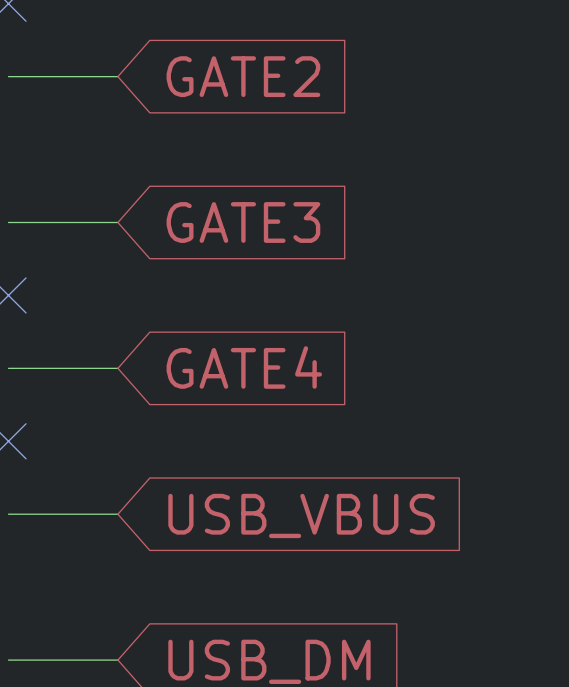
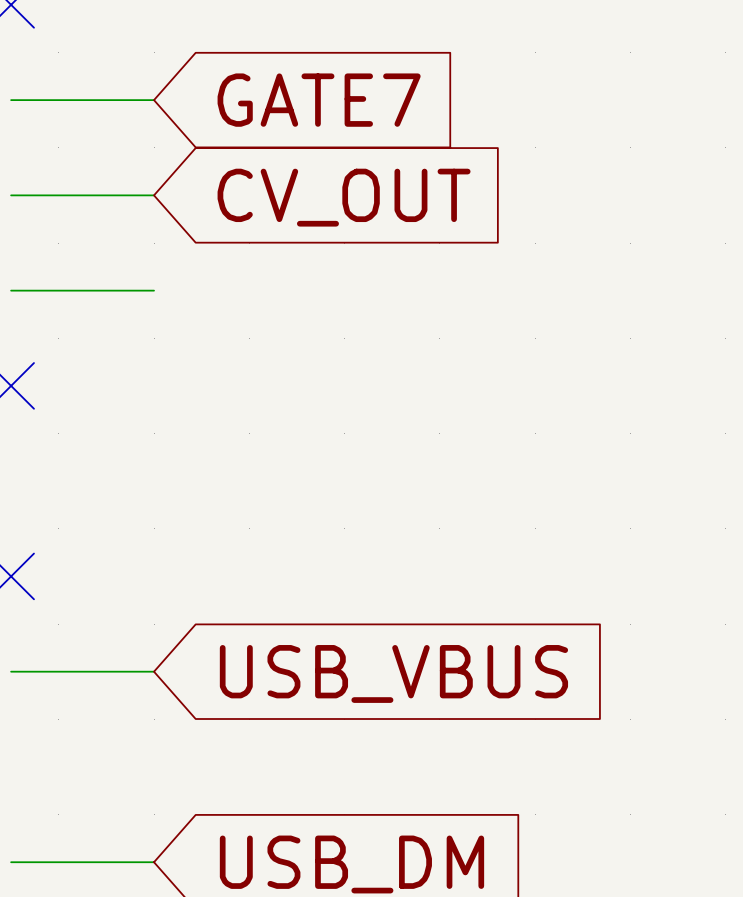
global label: GATE2 (243, 76) -> GATE7 (319, 100)
global label: none -> CV_OUT (344, 197)
global label: GATE3 (243, 222) -> none
global label: GATE4 (244, 367) -> none
wire: (8, 368) (117, 368) -> (11, 195) (154, 195)

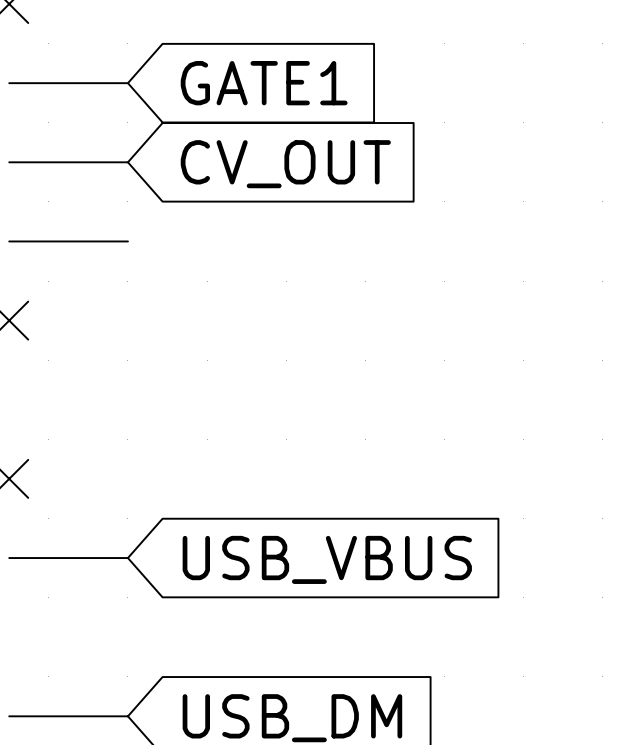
global label: GATE7 (319, 100) -> GATE1 (264, 83)

